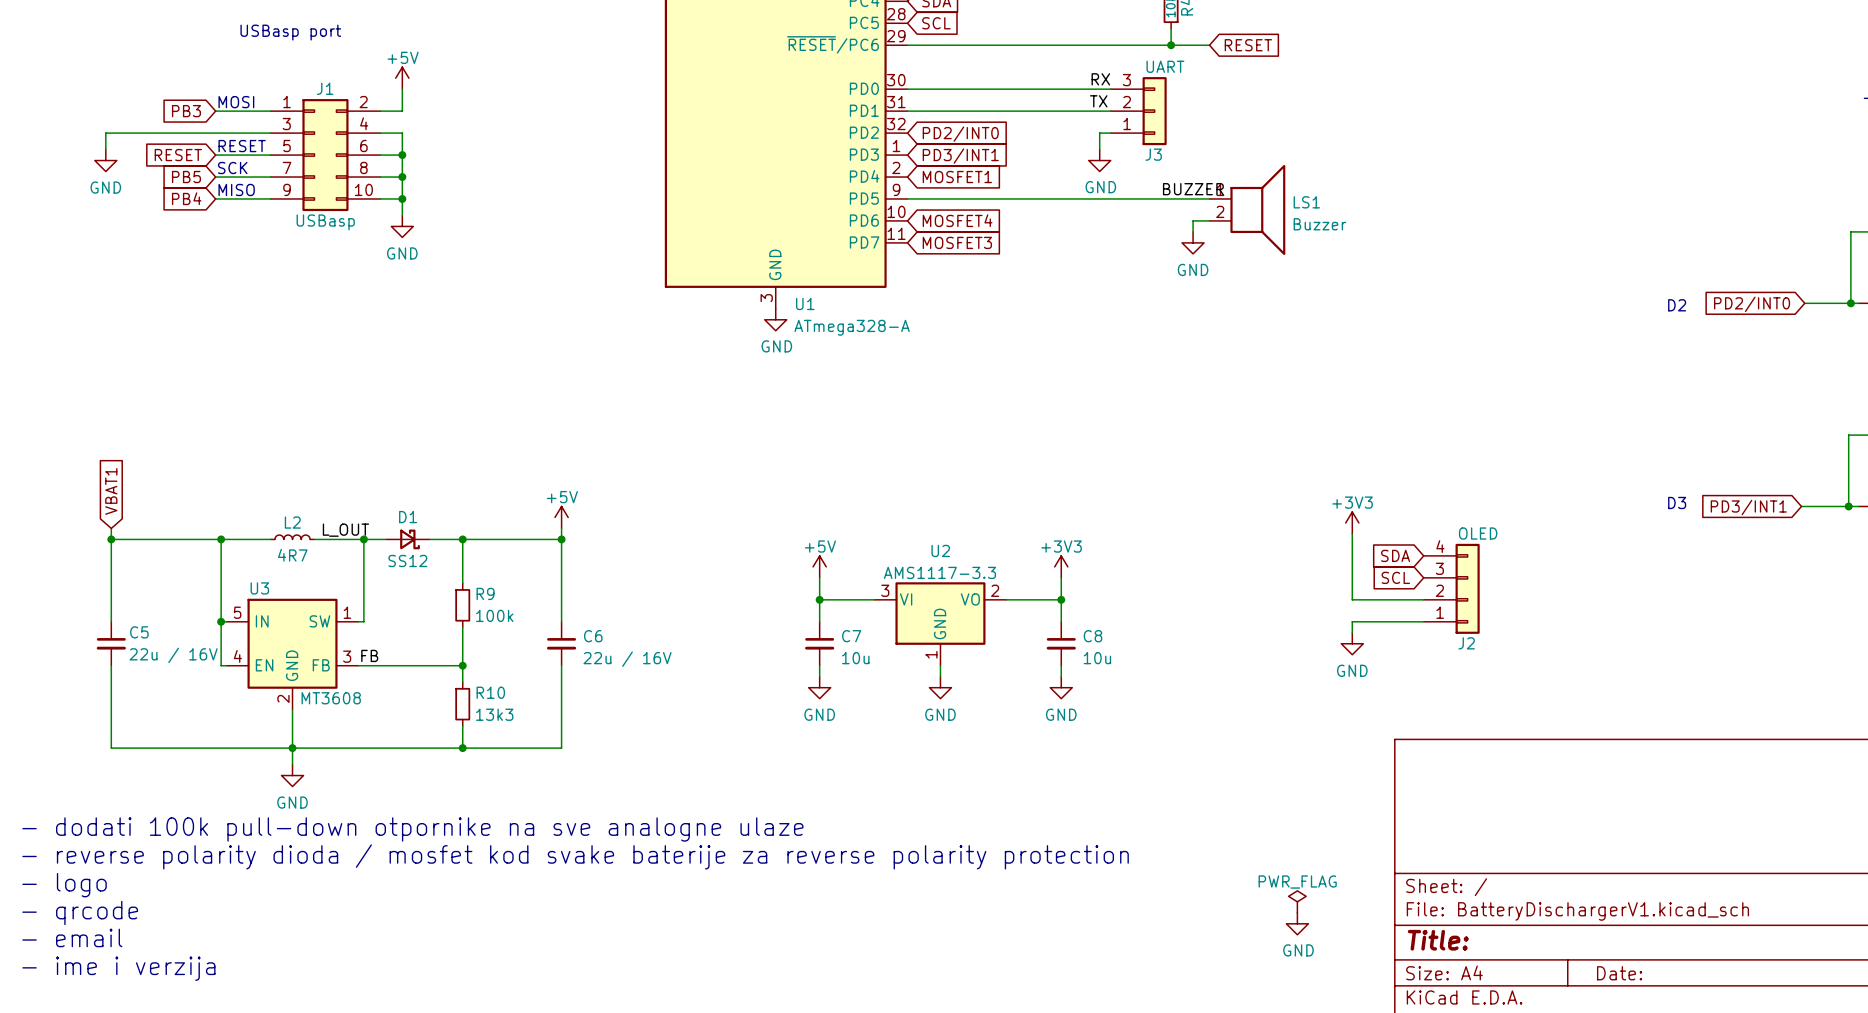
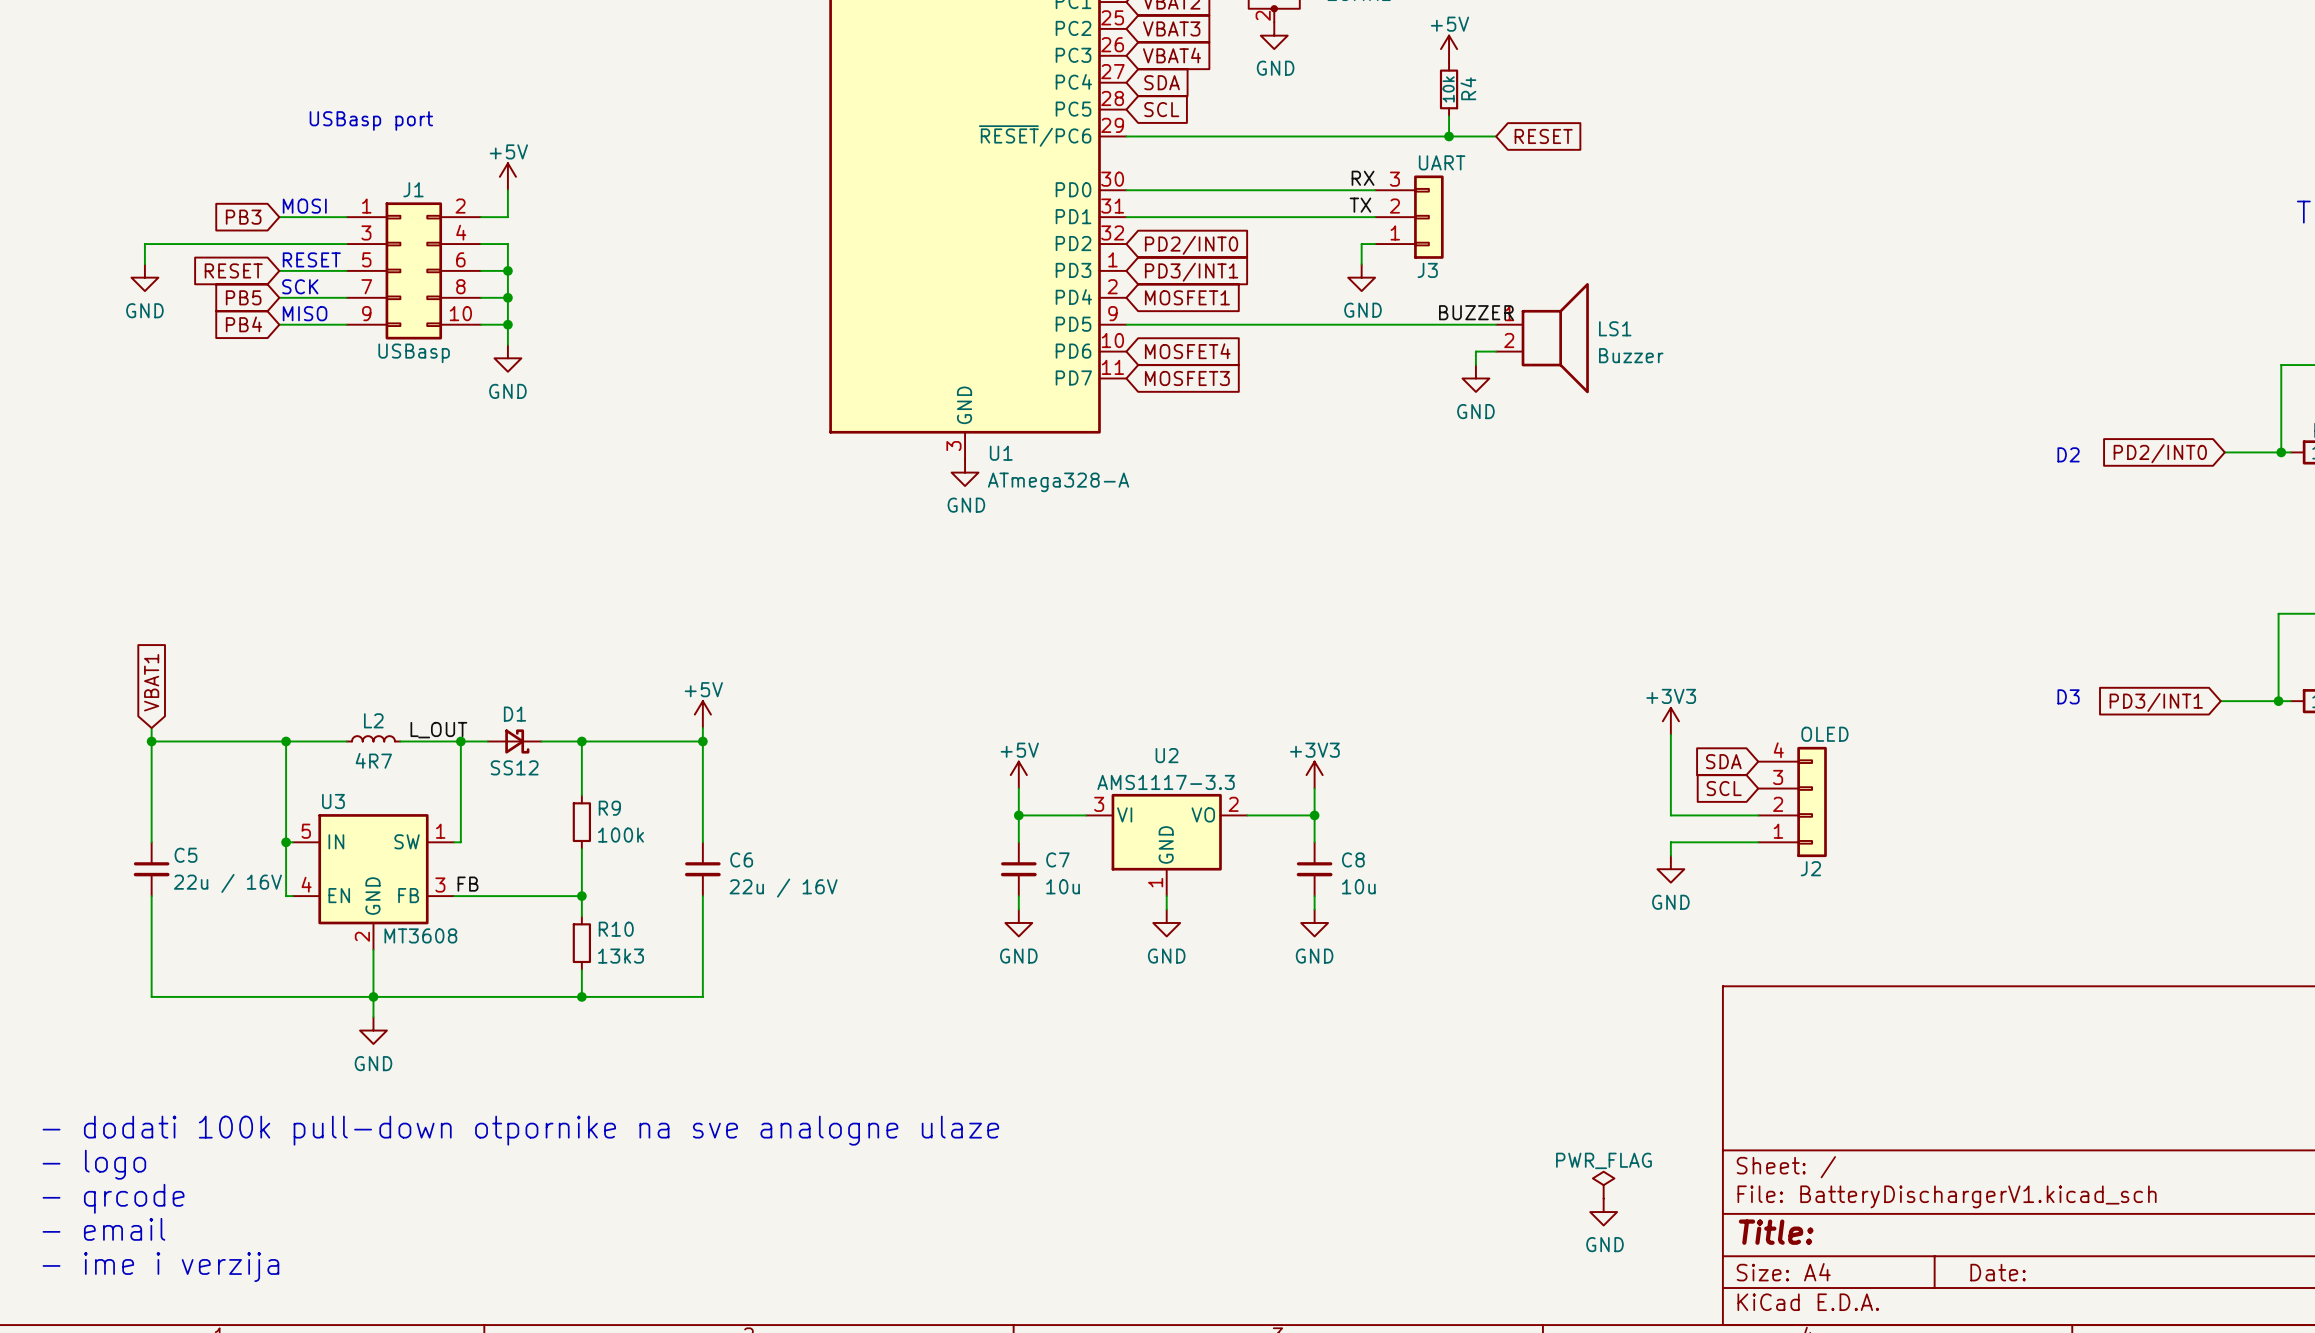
text: - dodati 100k pull-down otpornike na sve analogne ulaze (412, 829) -> none
text: - reverse polarity dioda / mosfet kod svake baterije za reverse polarity protection (575, 856) -> - dodati 100k pull-down otpornike na sve analogne ulaze (520, 1130)

